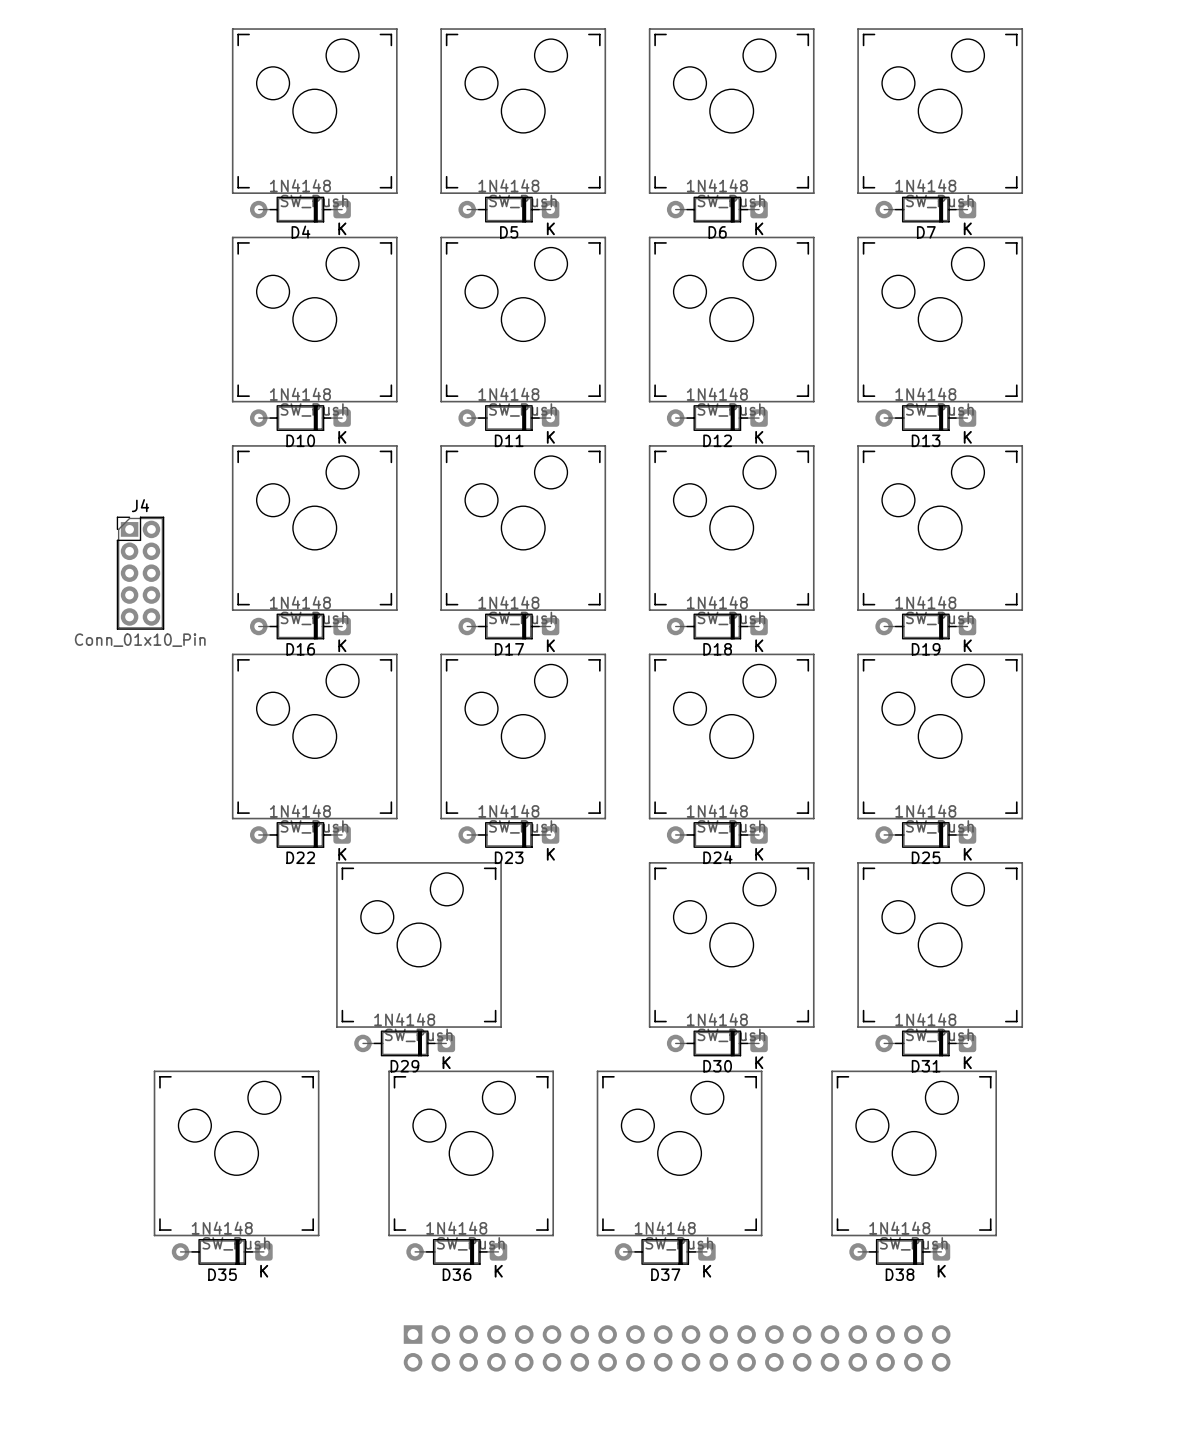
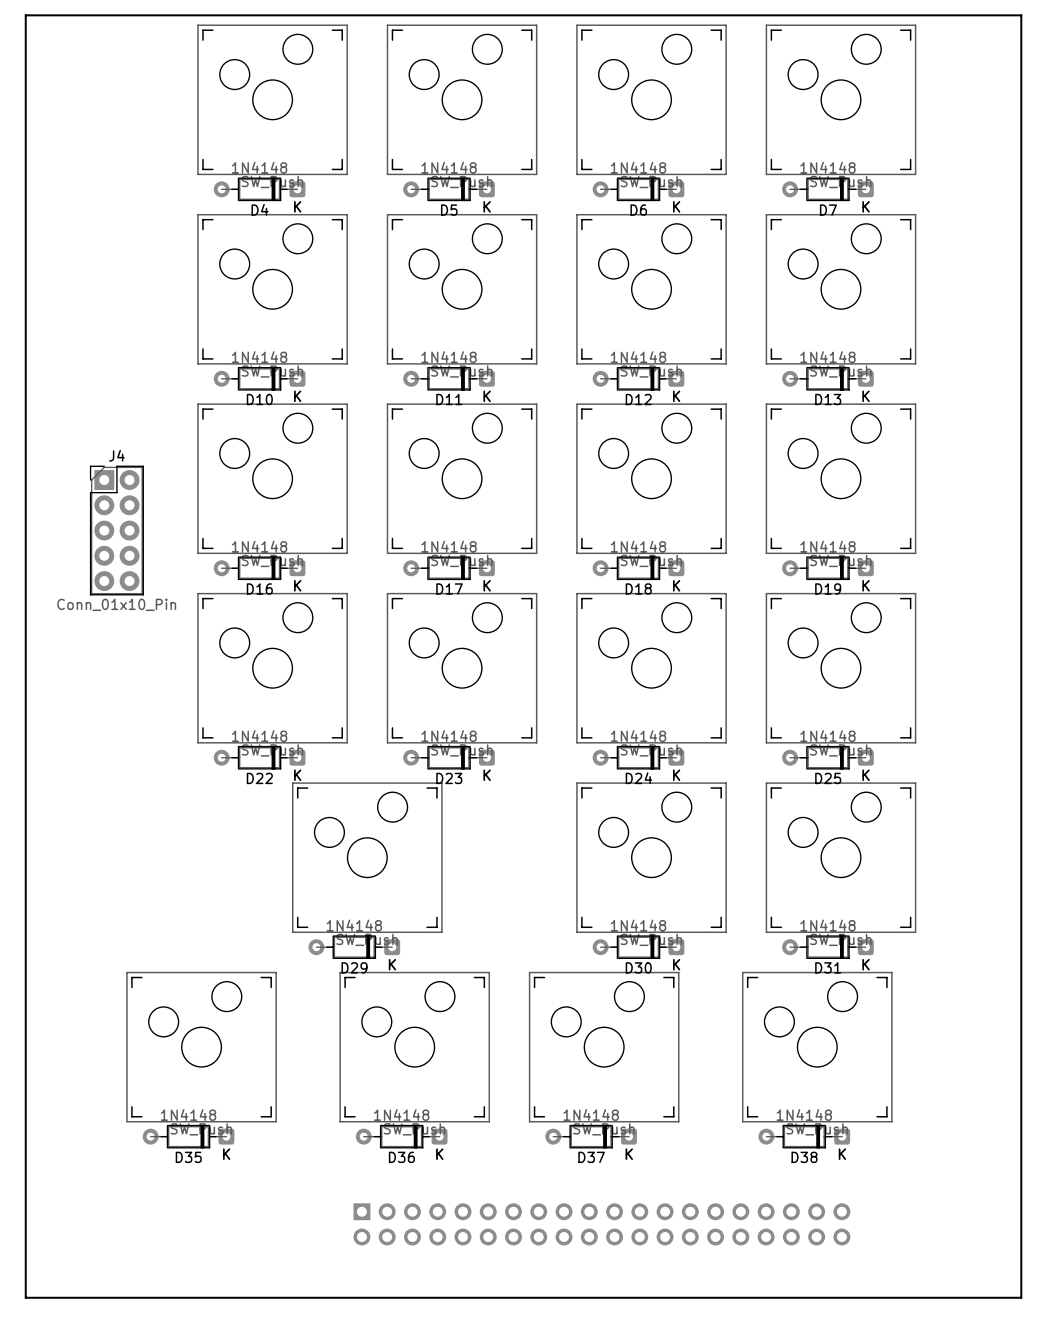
board edge: none -> (25, 15) (1021, 15) (1021, 1297) (25, 1297) (25, 15)
J4 footprint: [116, 516, 165, 630] -> [89, 465, 144, 596]

